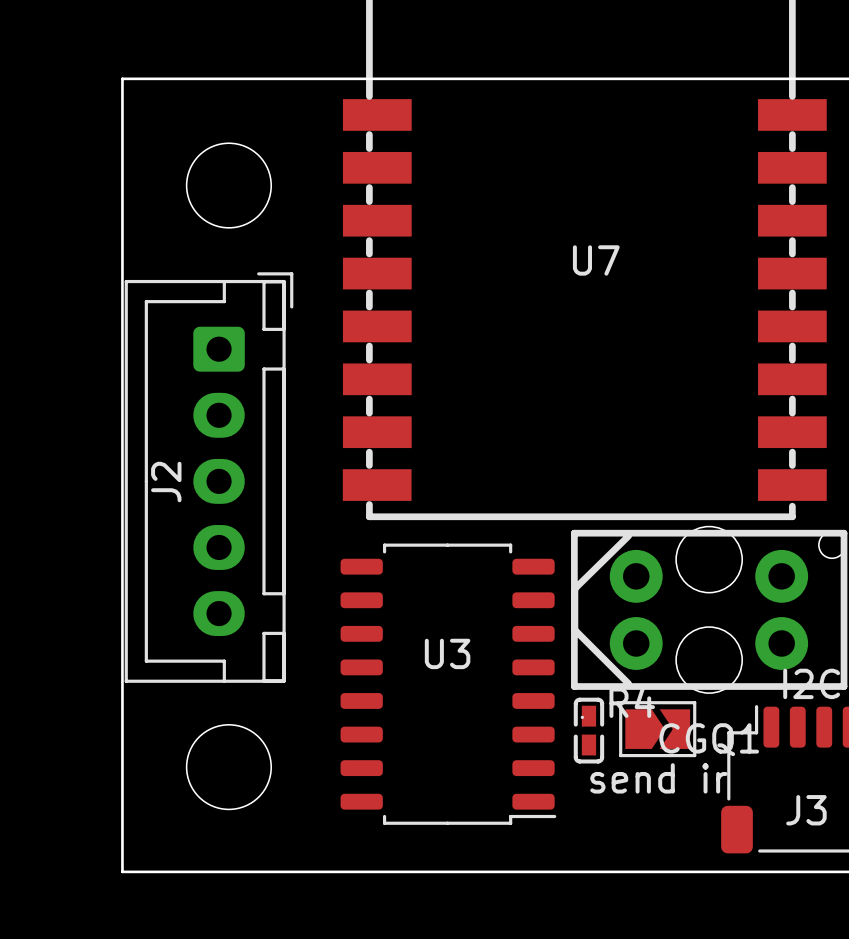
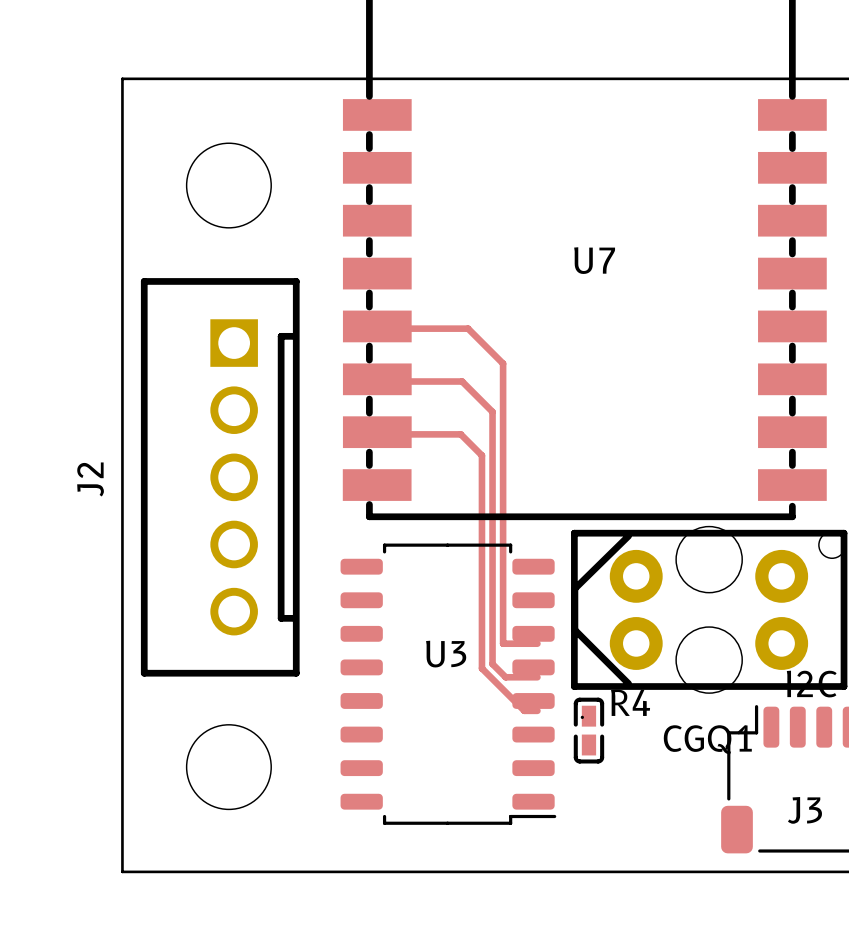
J2 footprint: [124, 272, 294, 683] -> [140, 278, 300, 677]
track: none -> (402, 328) (468, 328) (503, 363) (503, 643) (537, 643)
track: none -> (402, 381) (462, 381) (492, 411) (492, 664) (505, 677) (537, 677)
track: none -> (402, 434) (460, 434) (481, 455) (481, 668) (524, 710) (537, 710)
J2 name position: J2 (166, 482) -> J2 (90, 479)
part: send ir (657, 729) -> none

